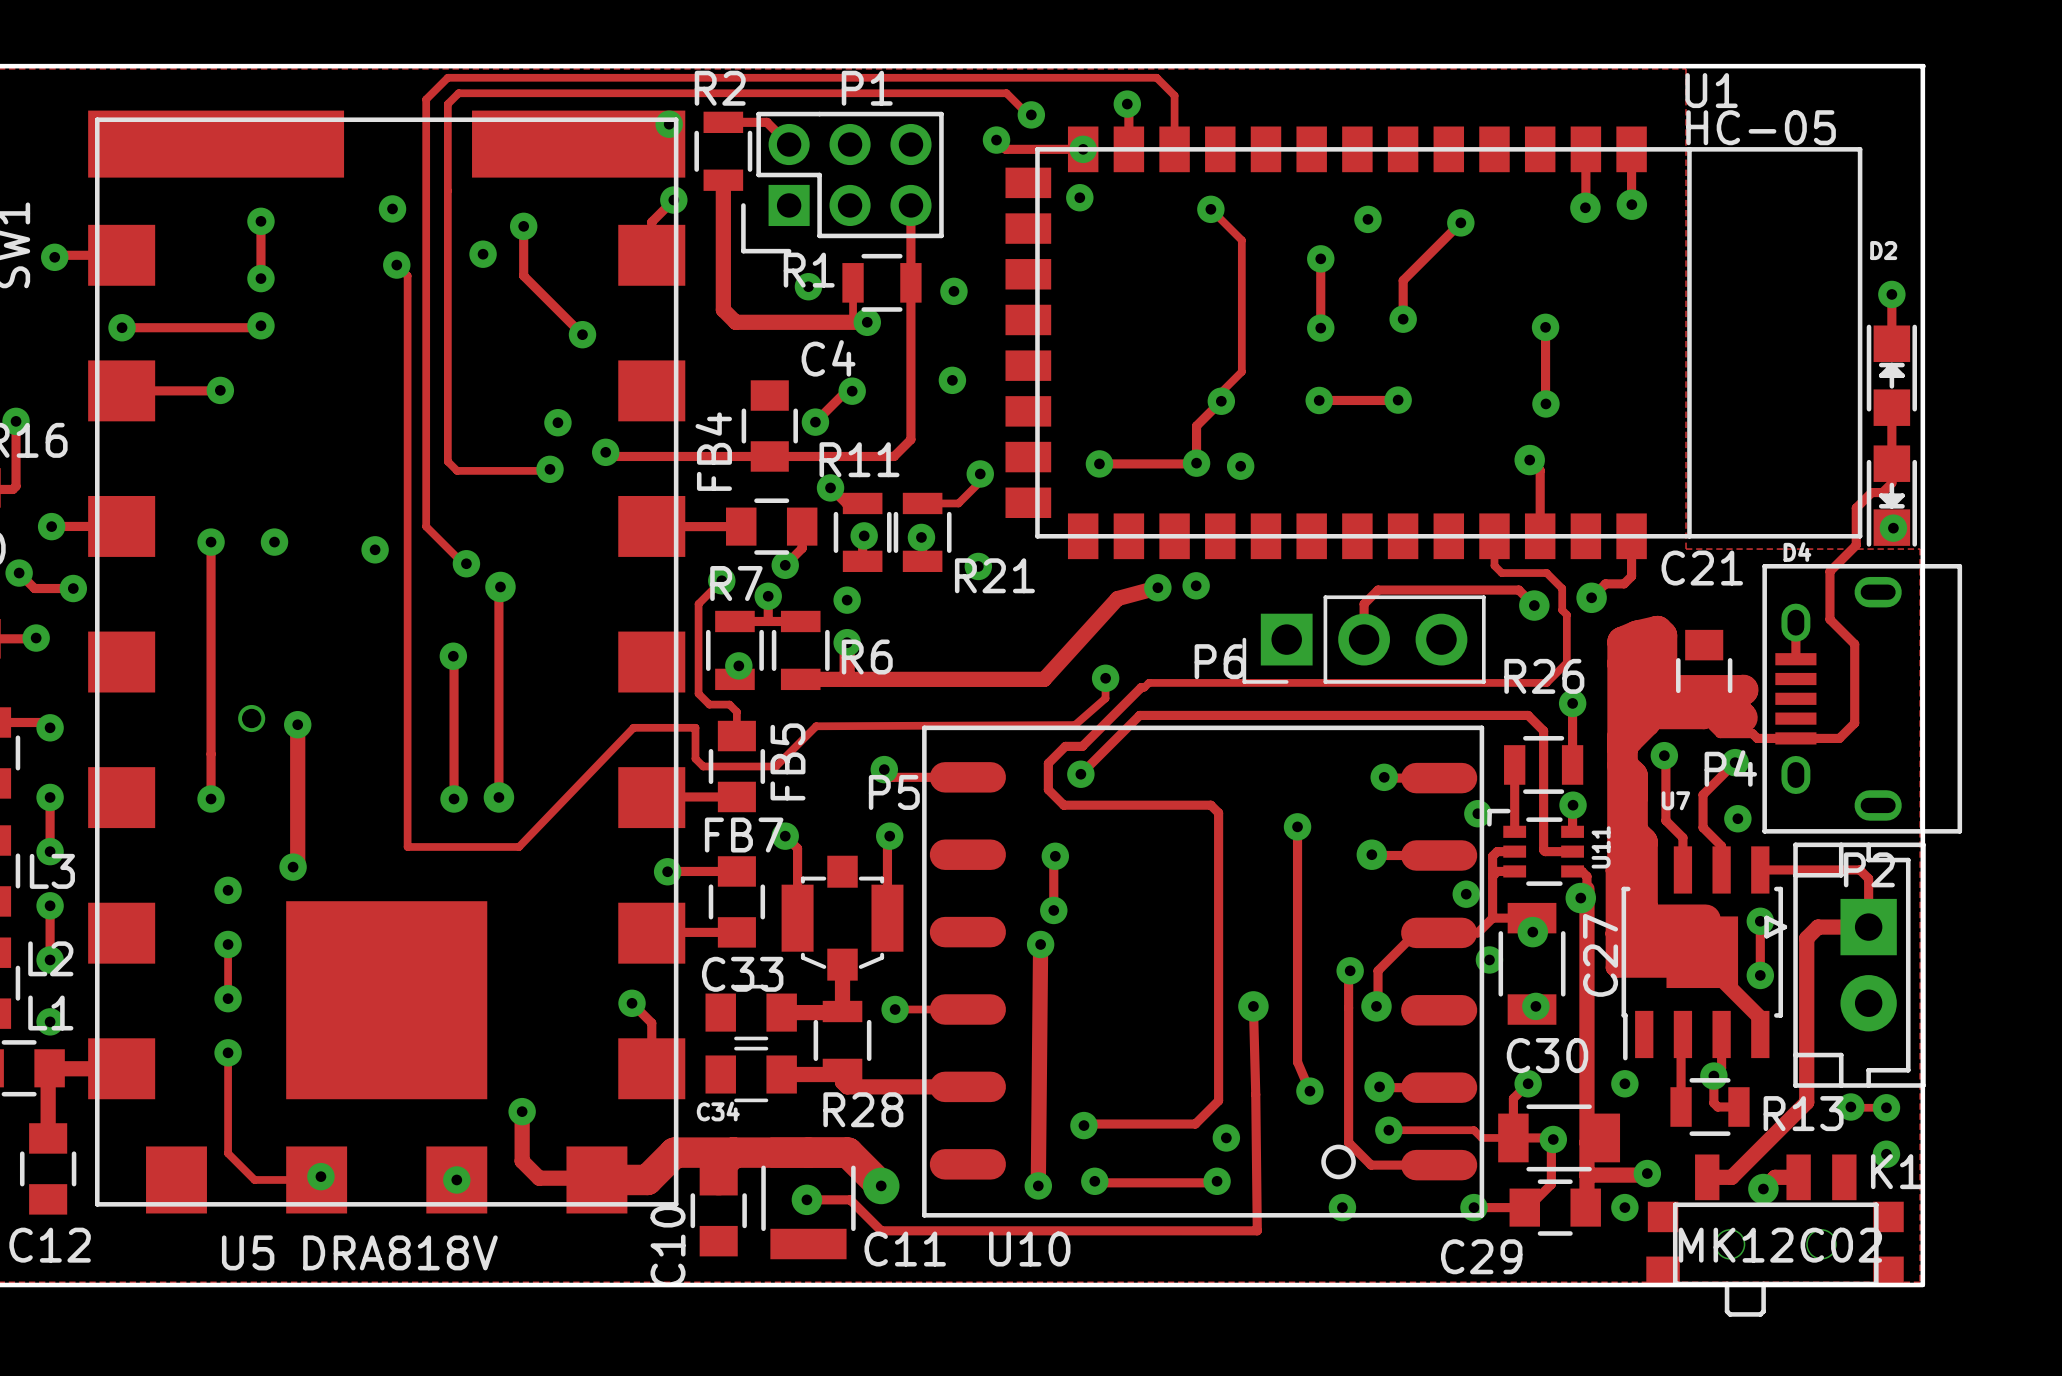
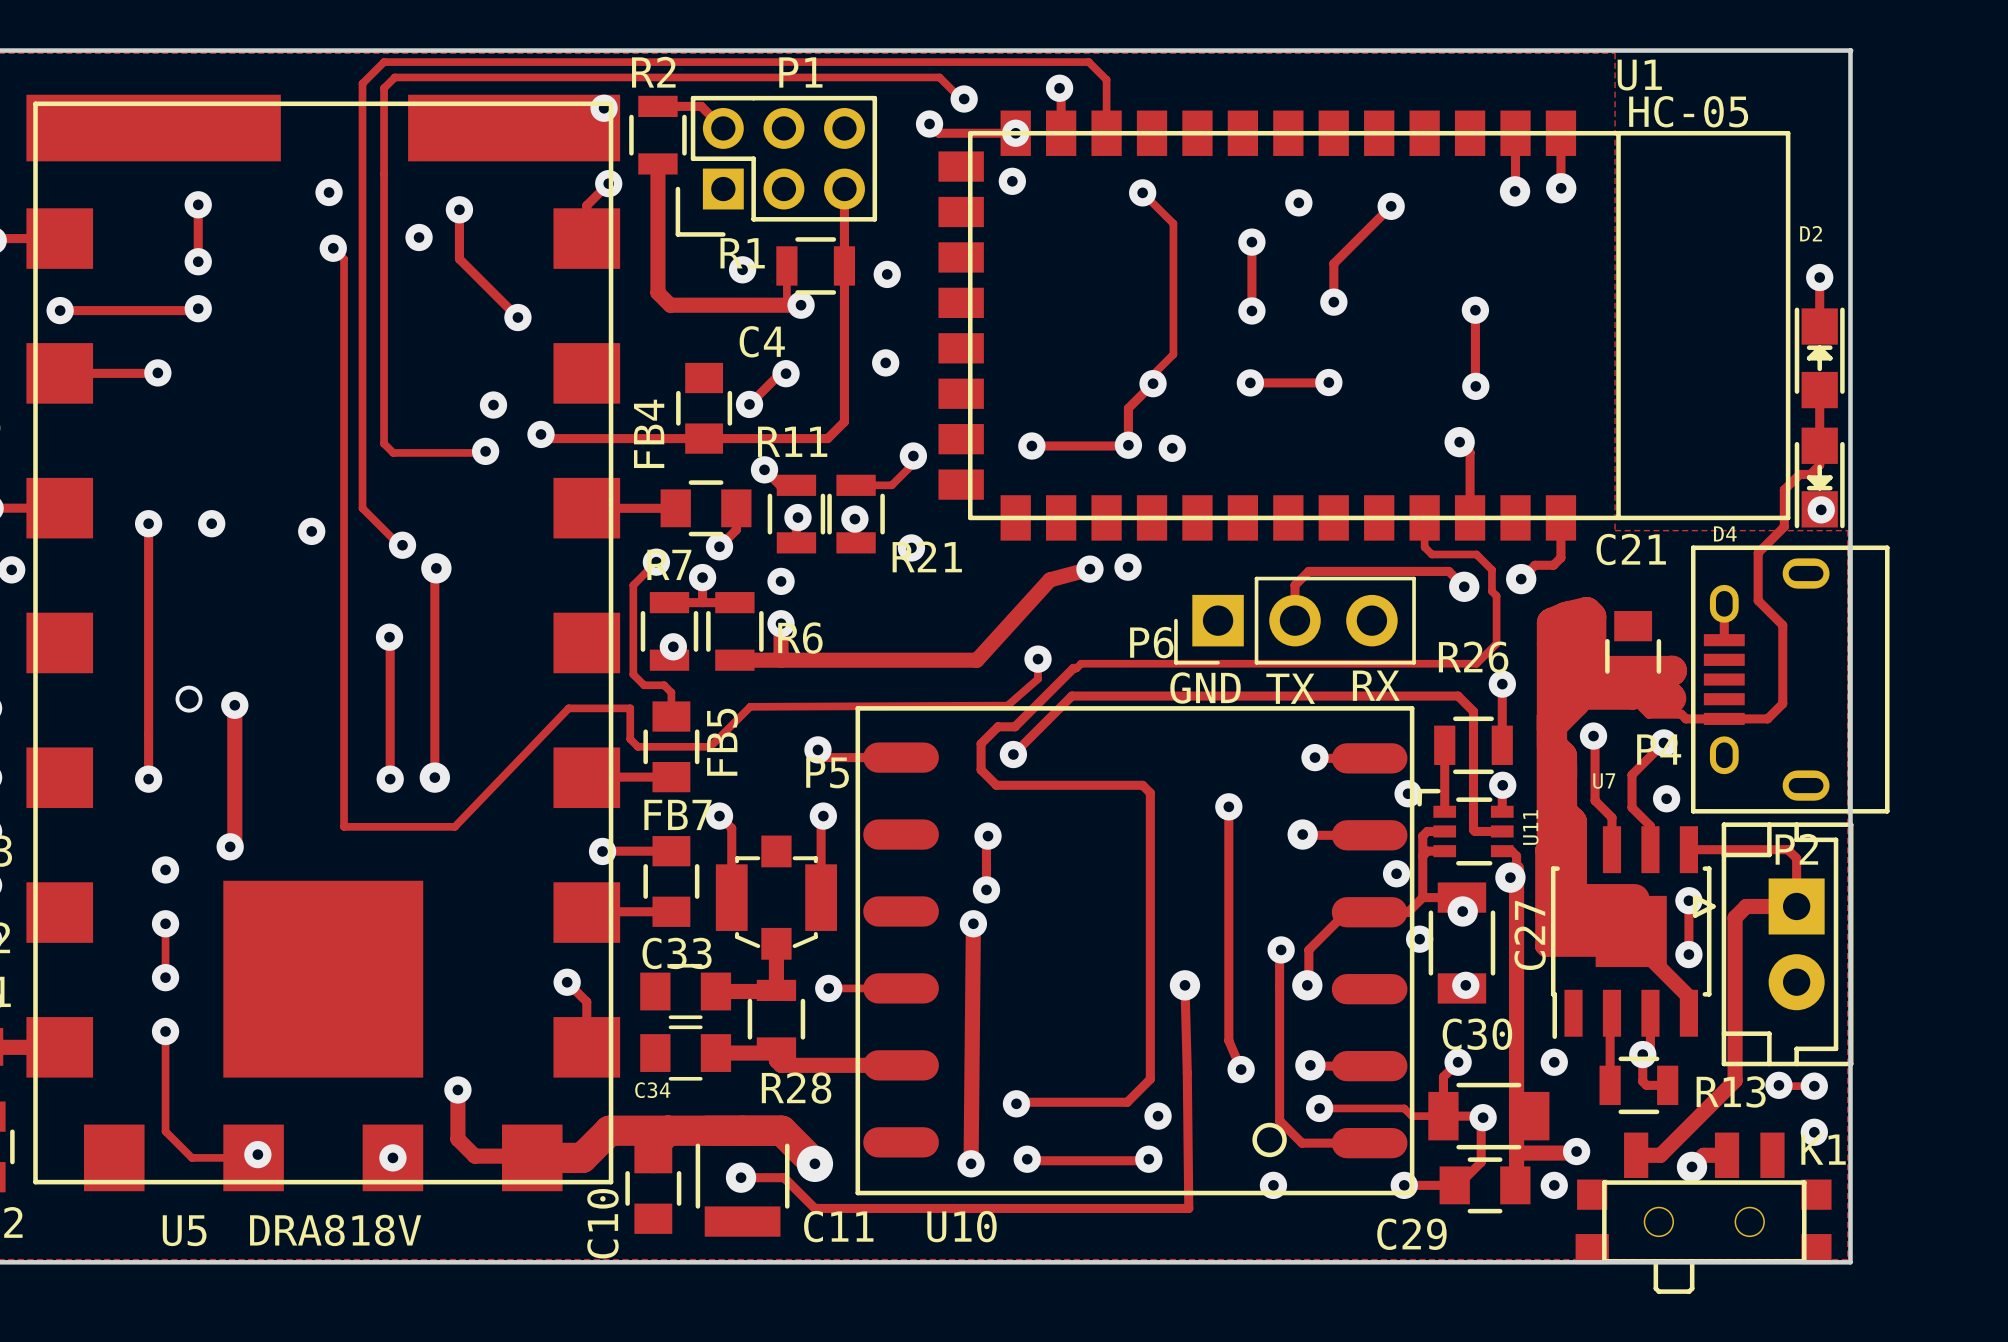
text: none -> RX (1376, 685)
text: none -> GND (1205, 688)
text: none -> TX (1290, 688)
K1 value: MK12C02 (1780, 1245) -> none

